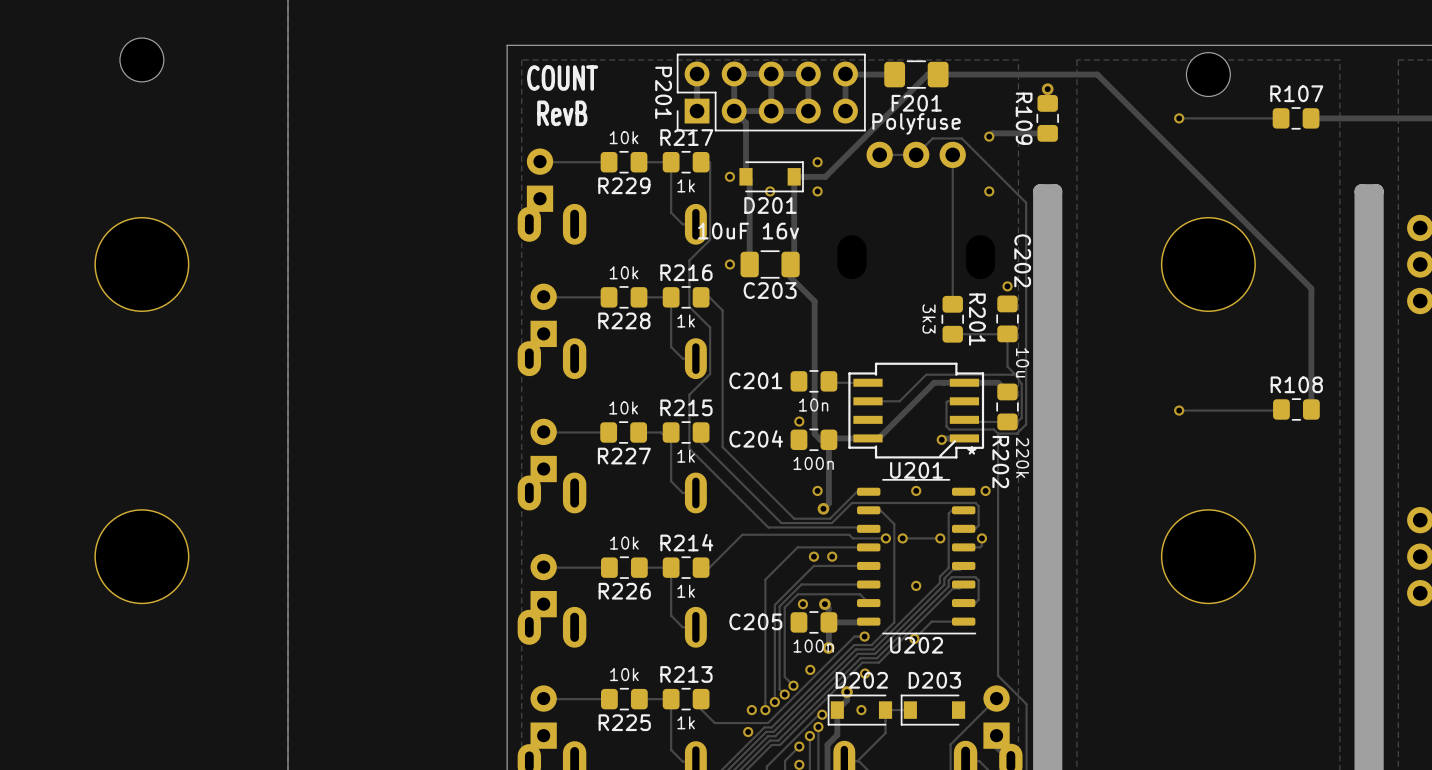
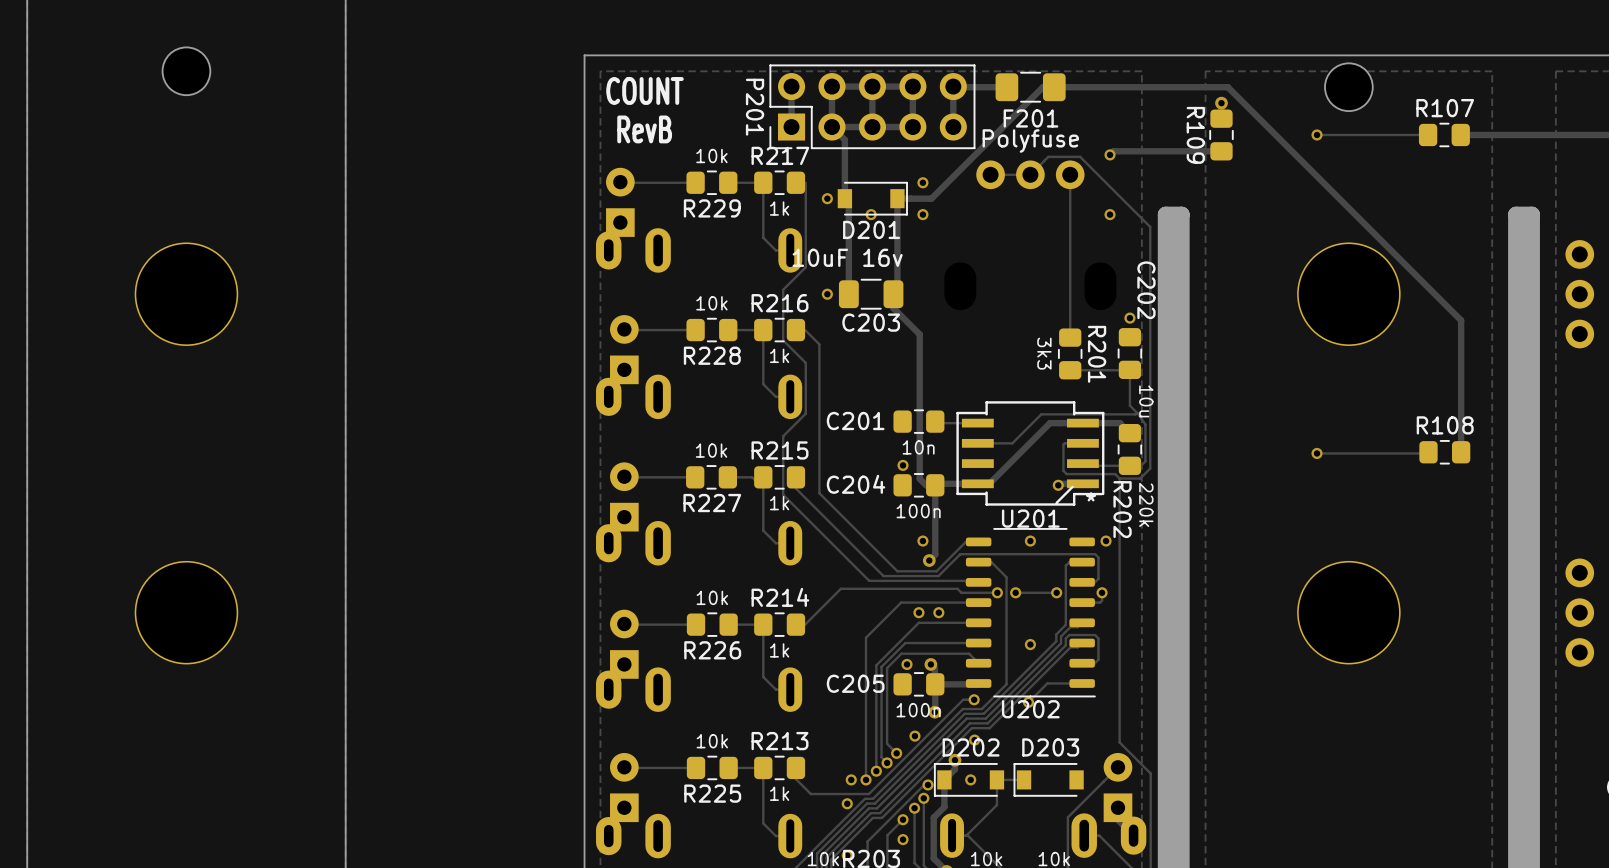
via position: (1047, 89) -> (1221, 103)
R109 position: (1047, 118) -> (1221, 134)
track: none -> (1221, 150) (1173, 151)

